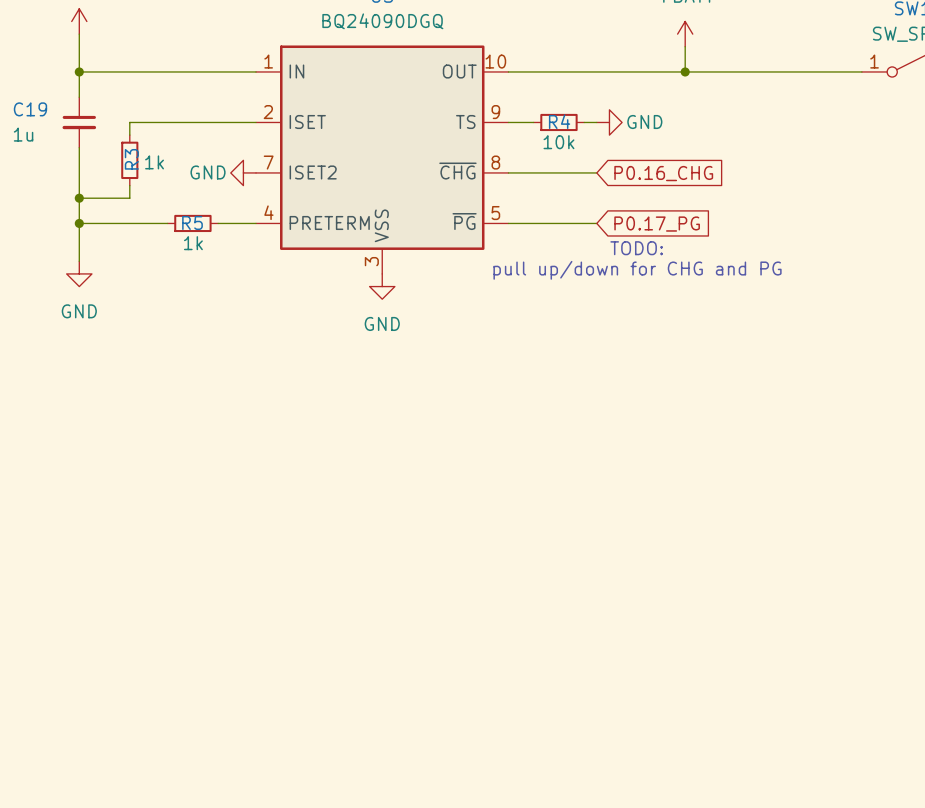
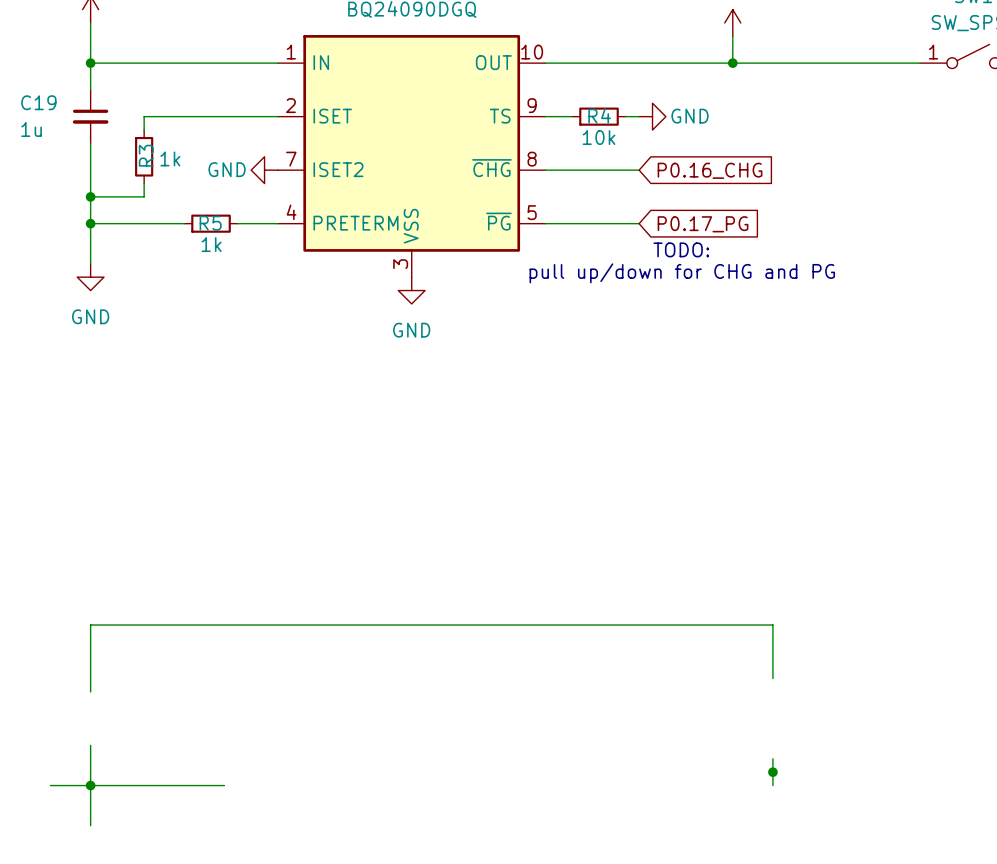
wire: none -> (772, 678) (772, 625) (90, 625) (90, 691)
wire: none -> (90, 745) (90, 825)
wire: none -> (772, 758) (772, 785)
junction: none -> (772, 772)
wire: none -> (50, 785) (224, 785)
junction: none -> (90, 785)

